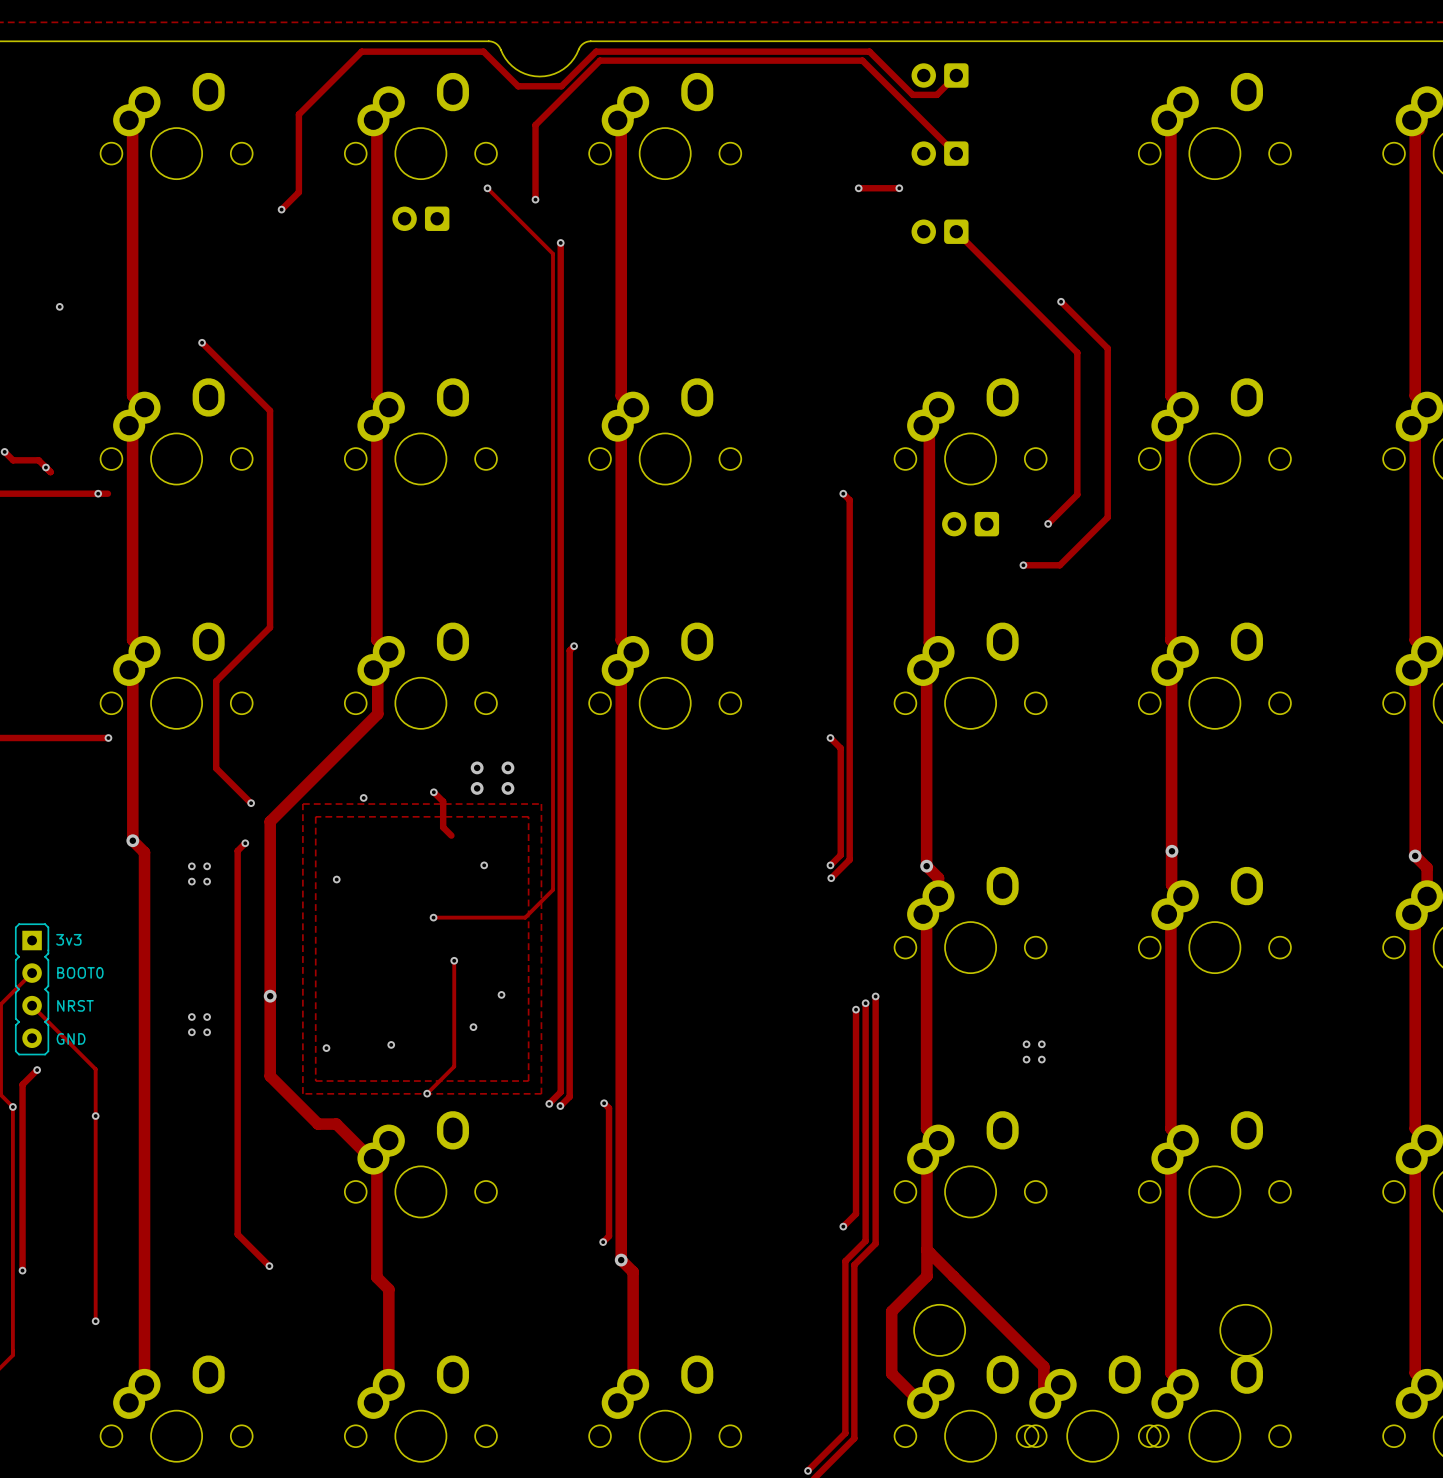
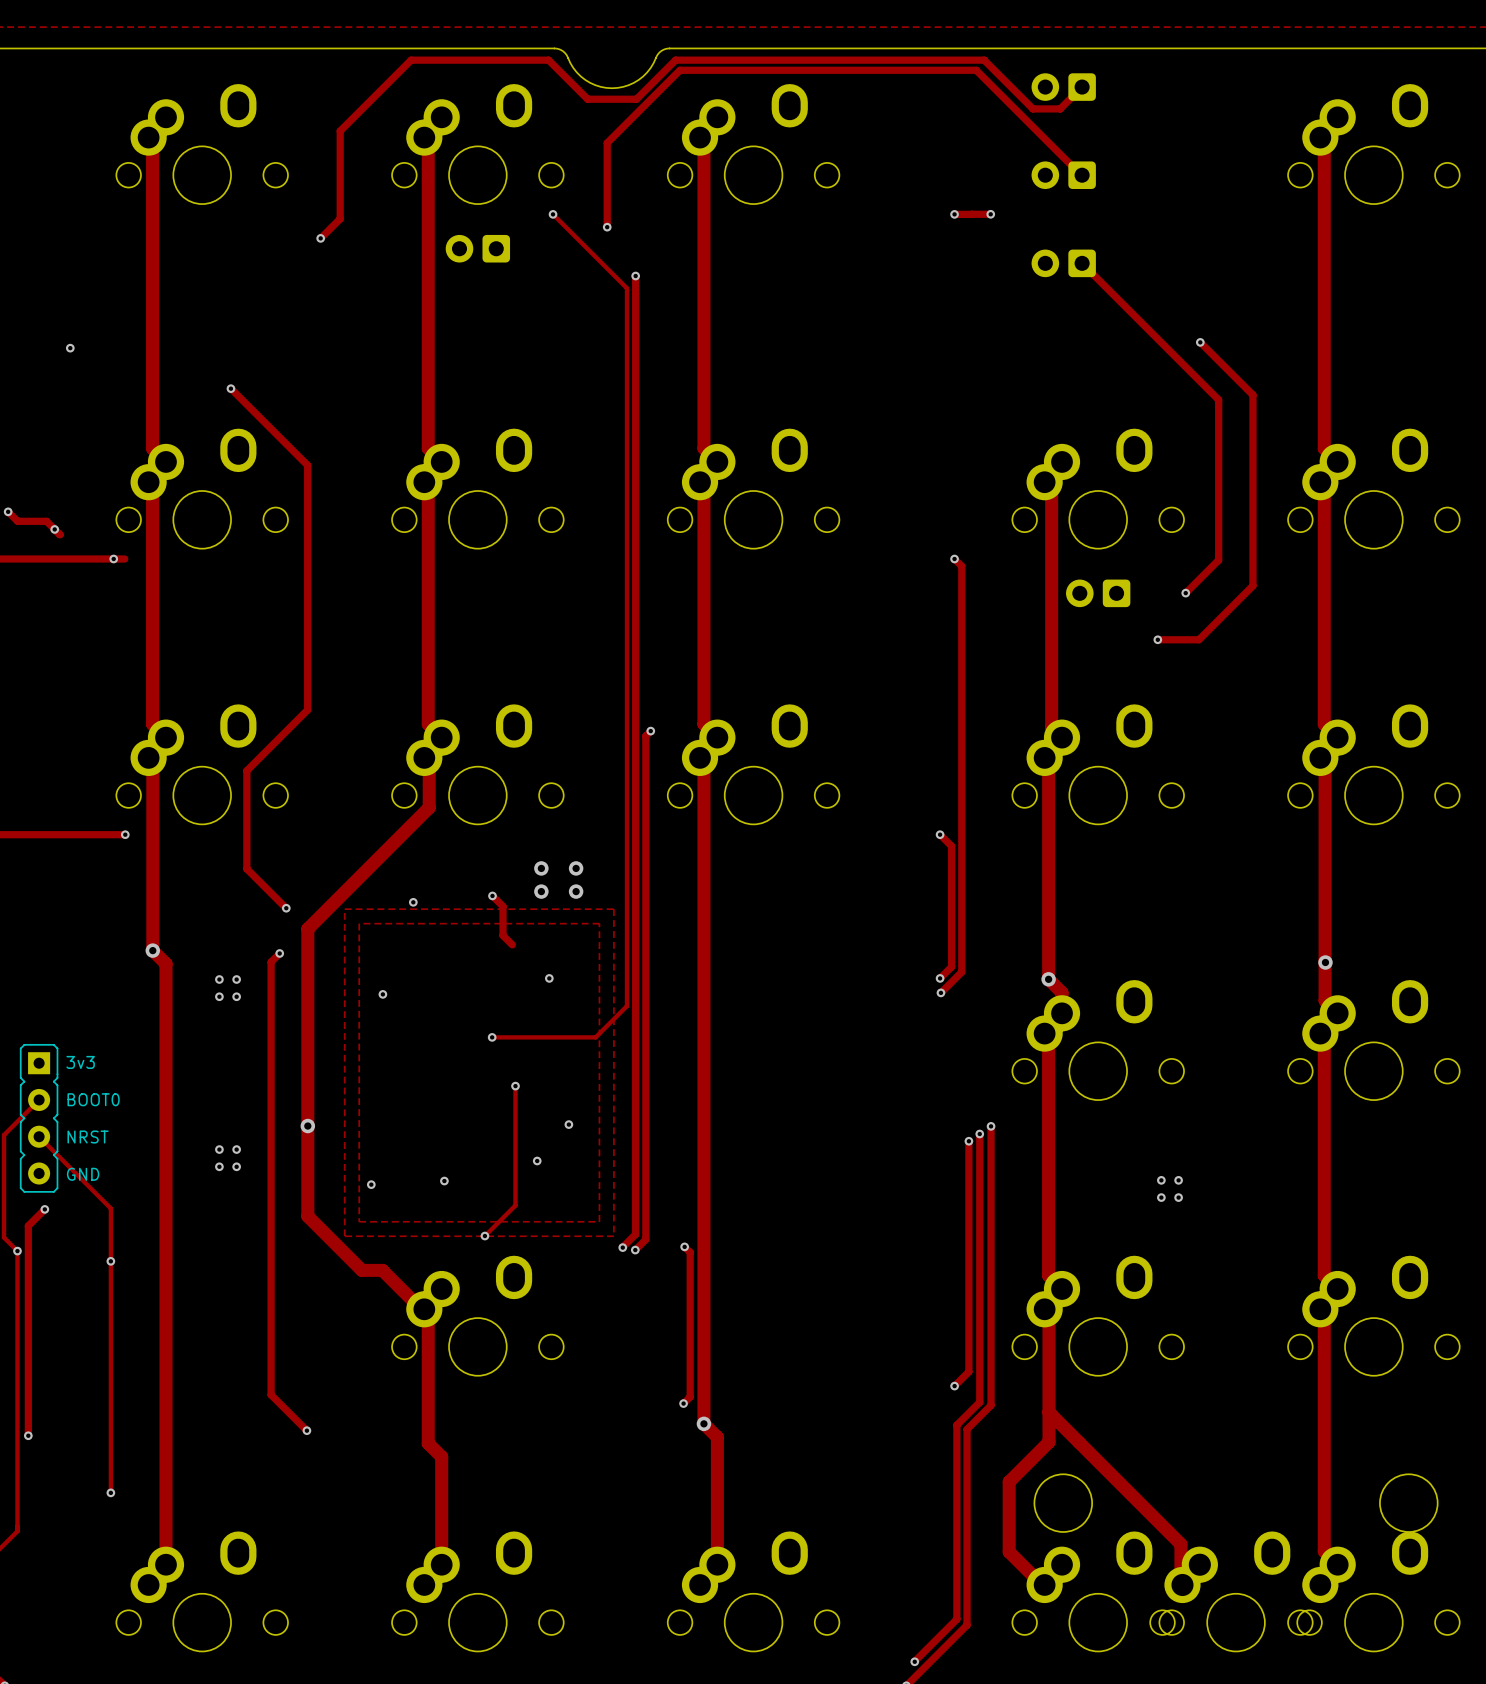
track: none -> (954, 214) (971, 214)
via: none -> (954, 214)
via: (858, 188) -> none
track: (875, 188) (899, 188) -> none
via: none -> (990, 214)
via: (899, 188) -> none

